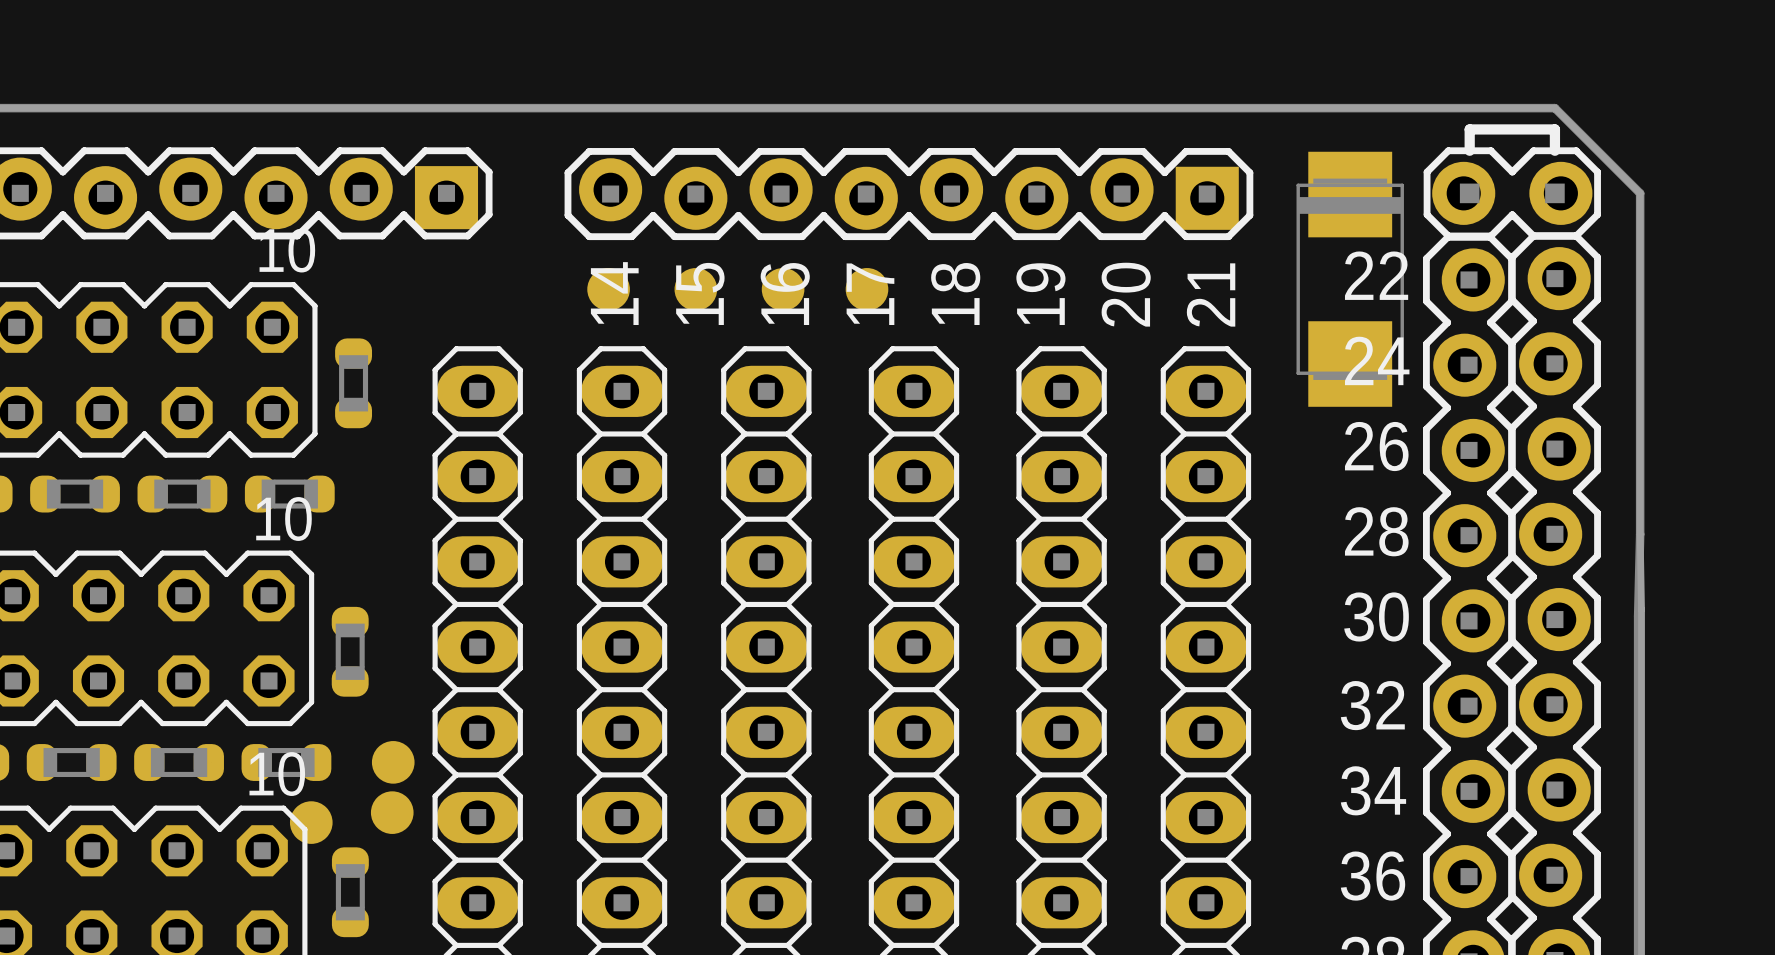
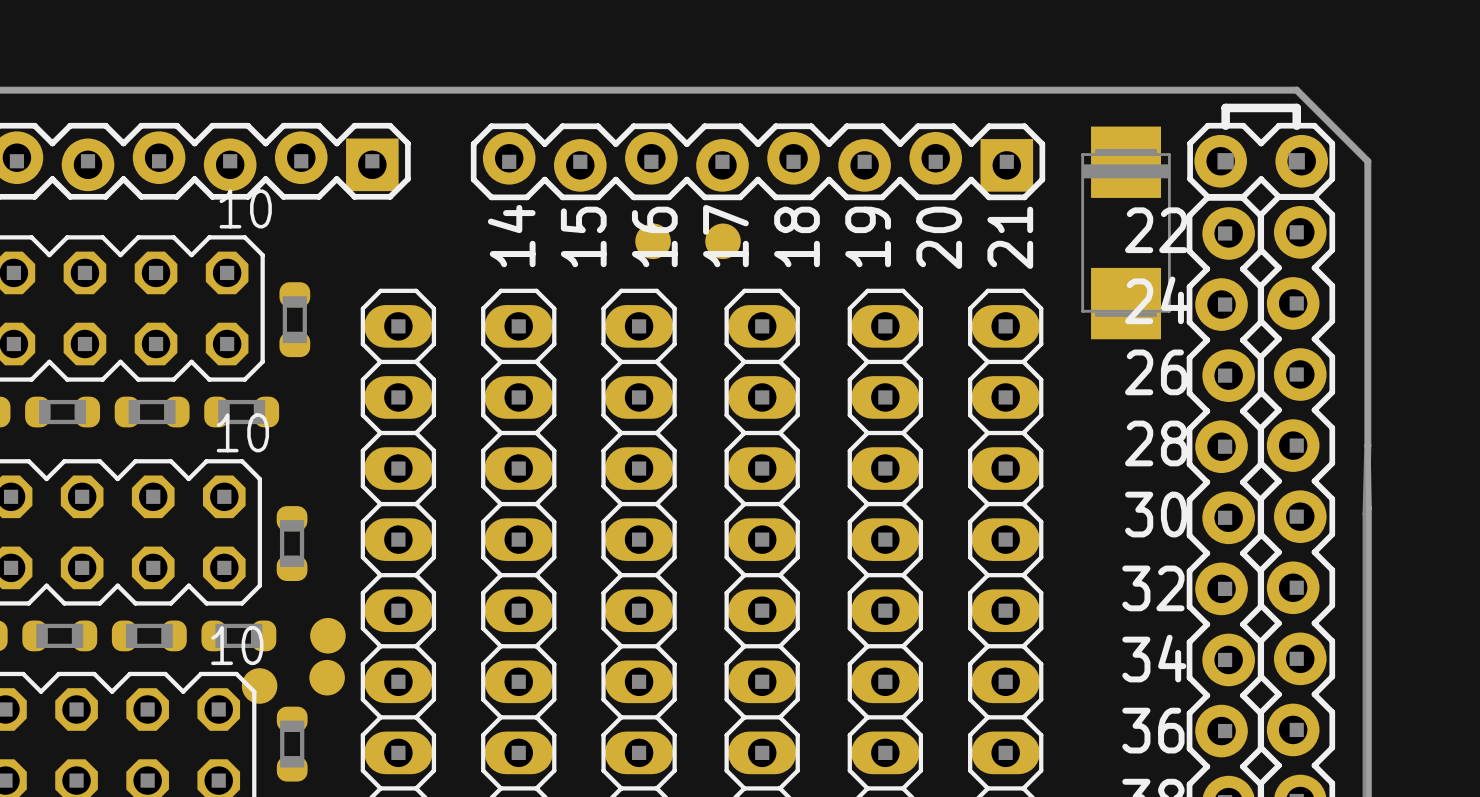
part: (608, 289) -> none
part: (695, 289) -> none

